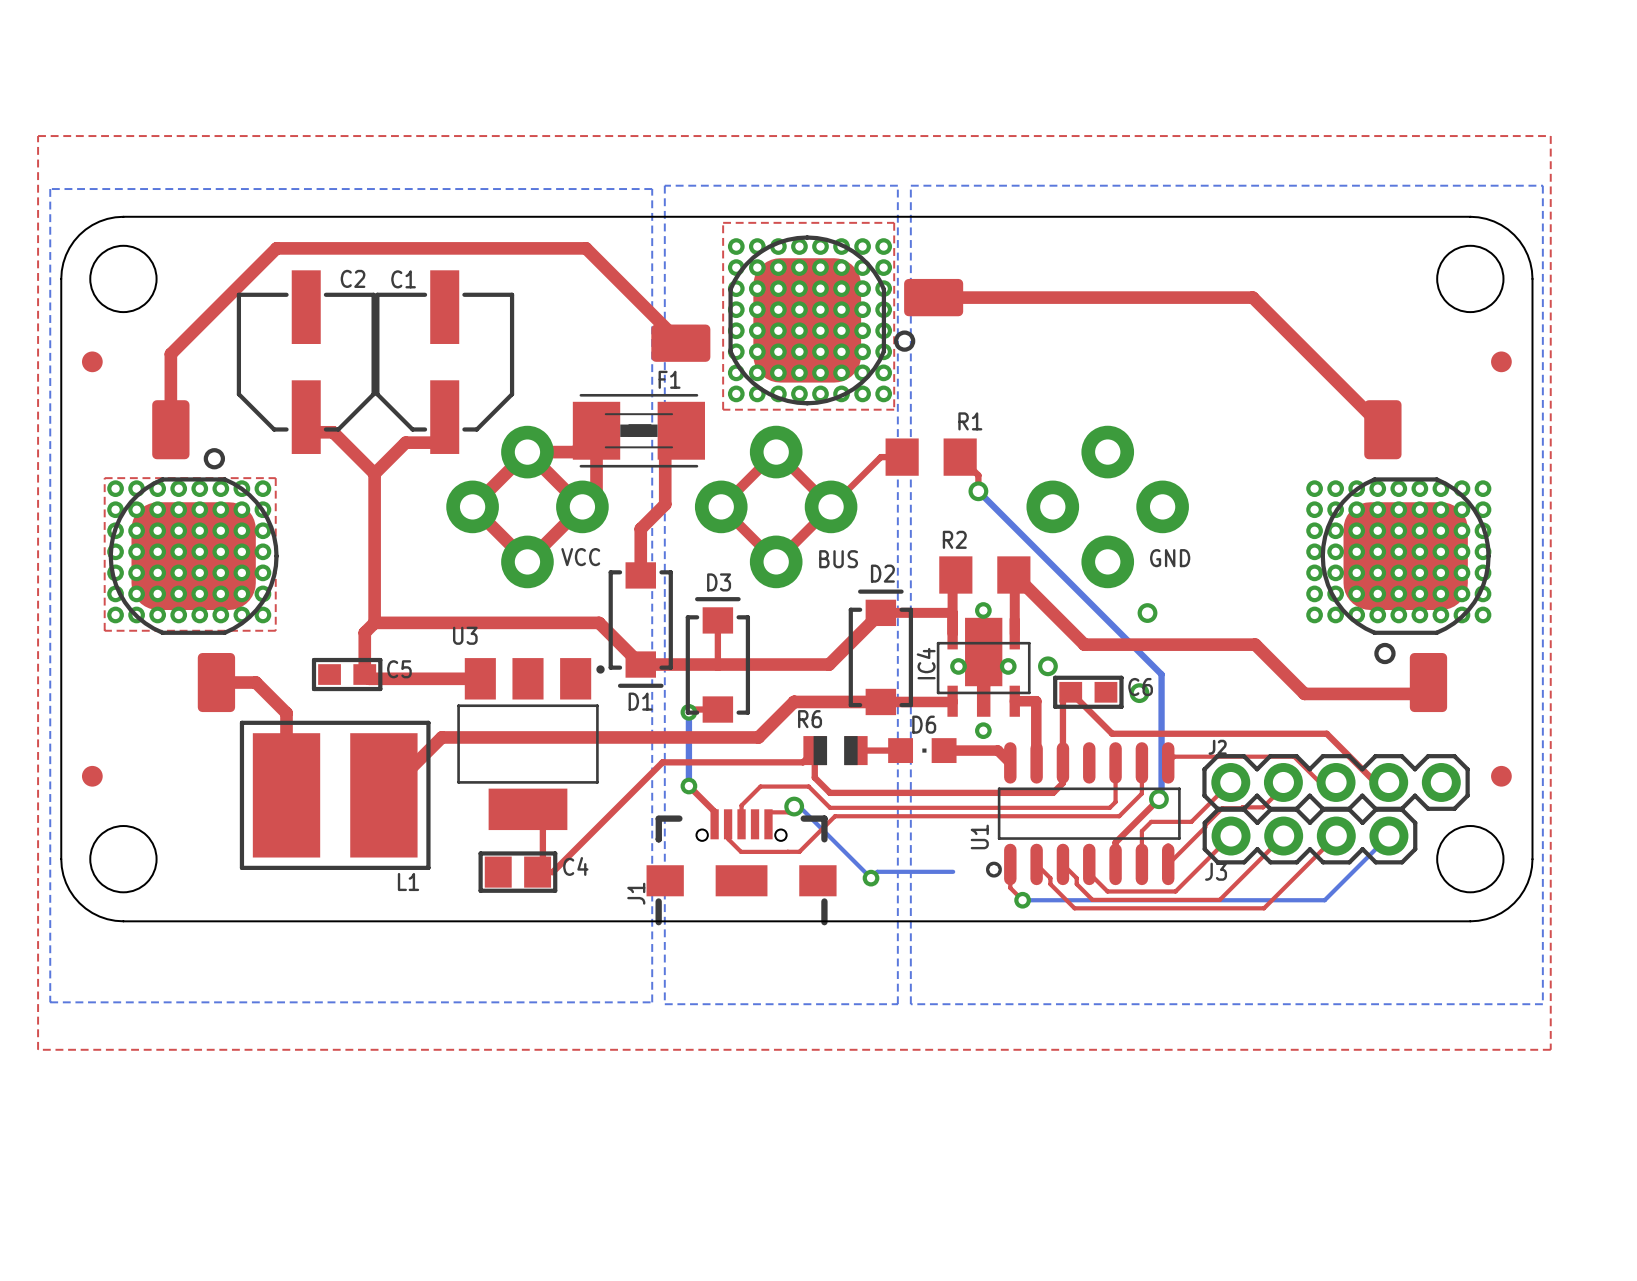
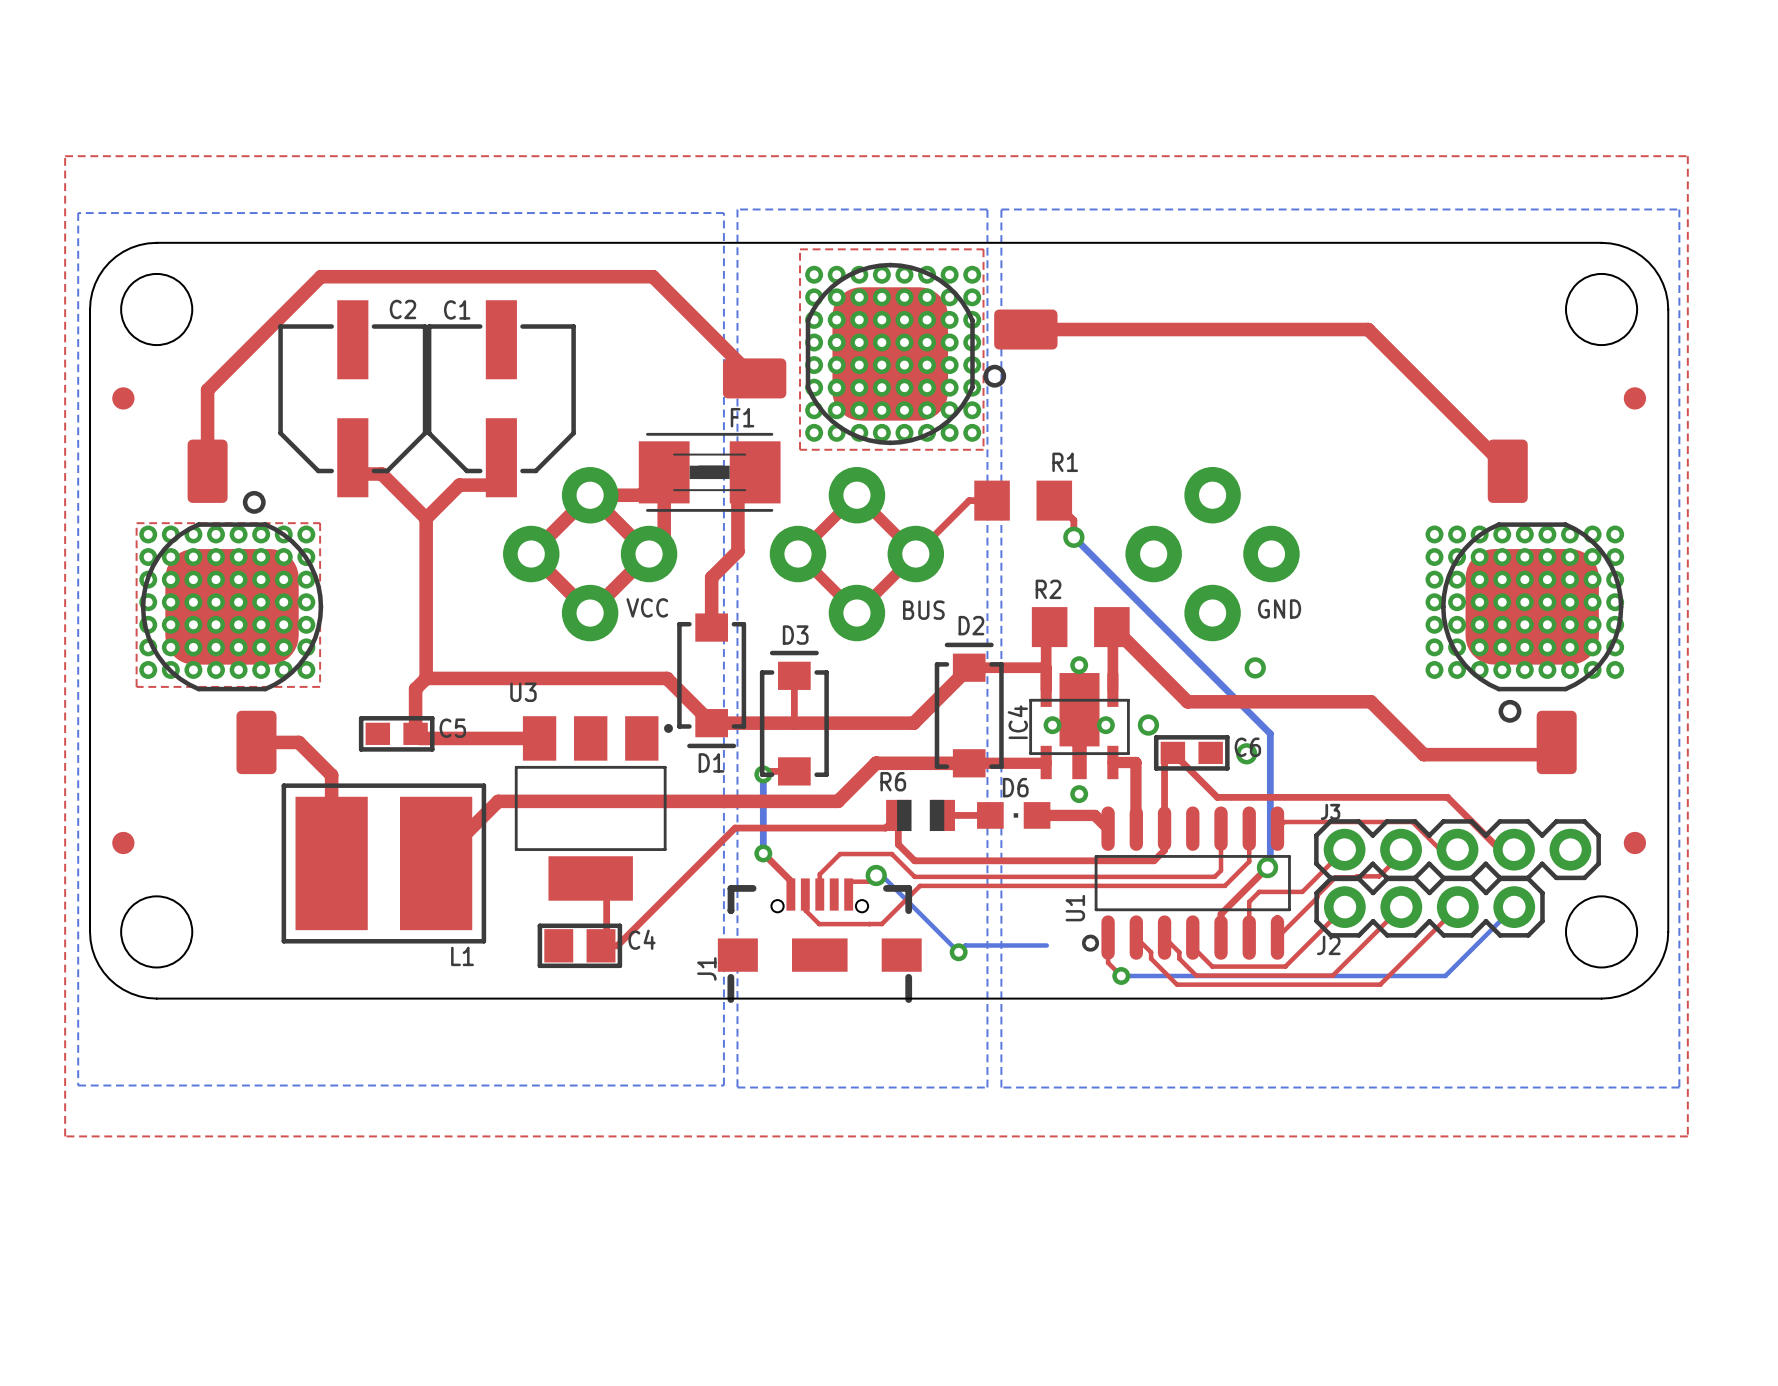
J2 name: J2 (1217, 747) -> J3 (1330, 811)
J3 name: J3 (1216, 871) -> J2 (1328, 945)

